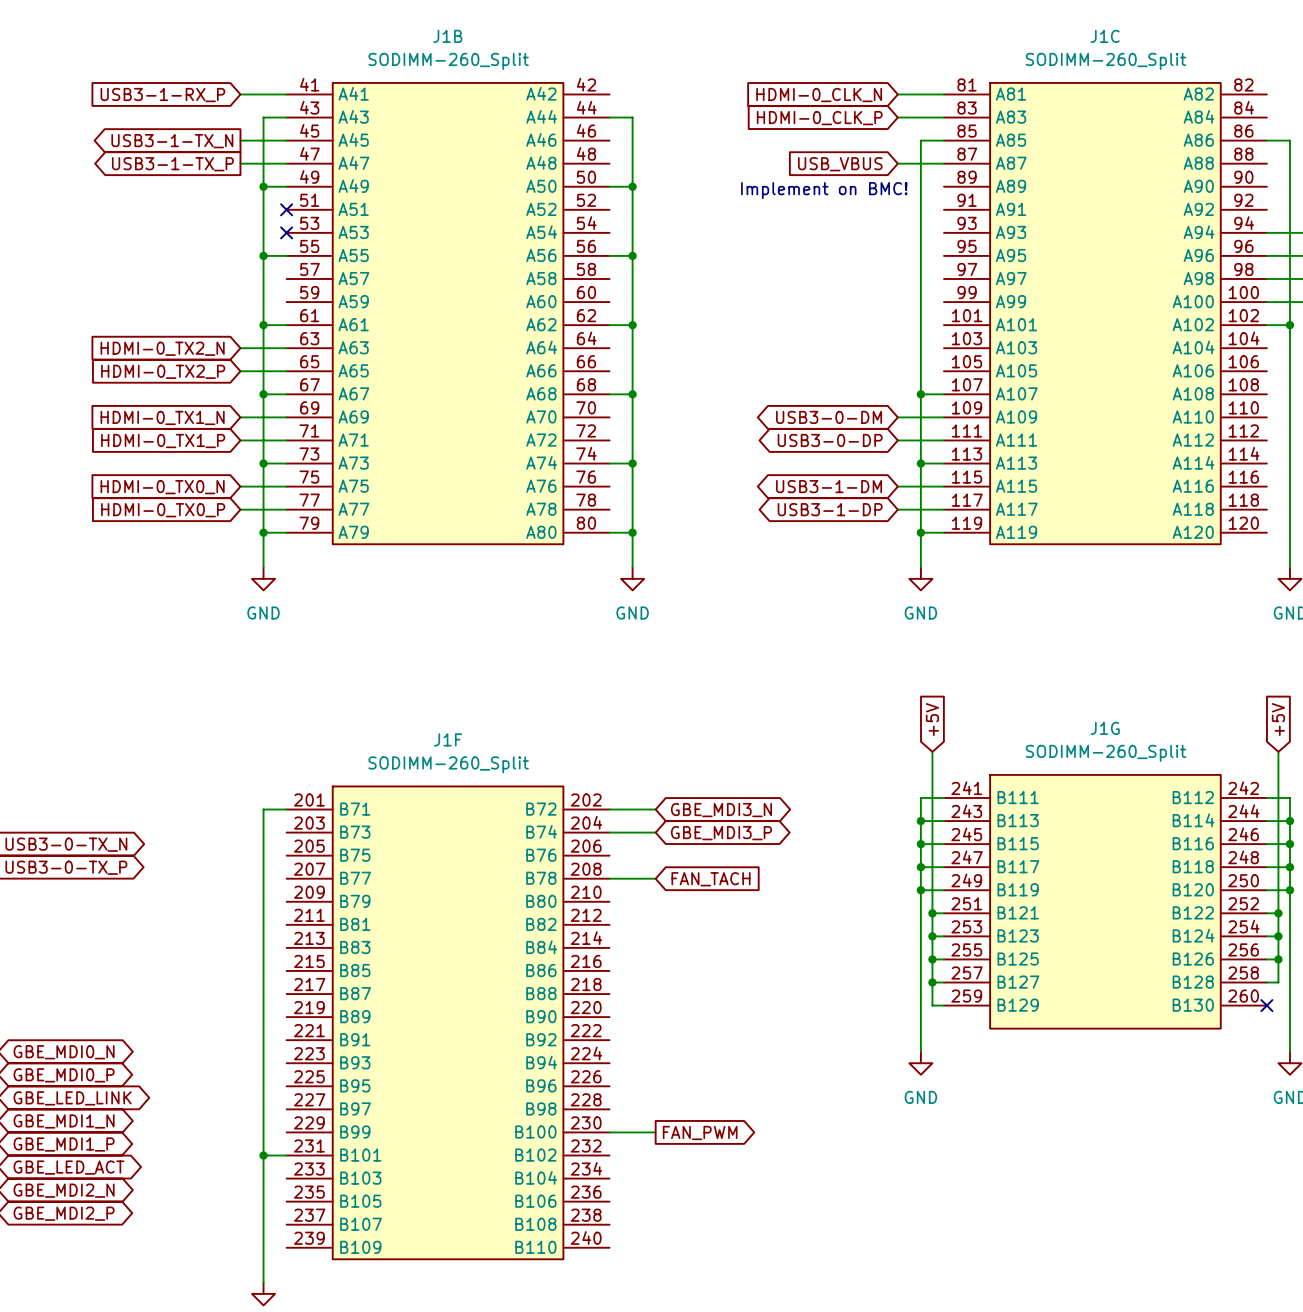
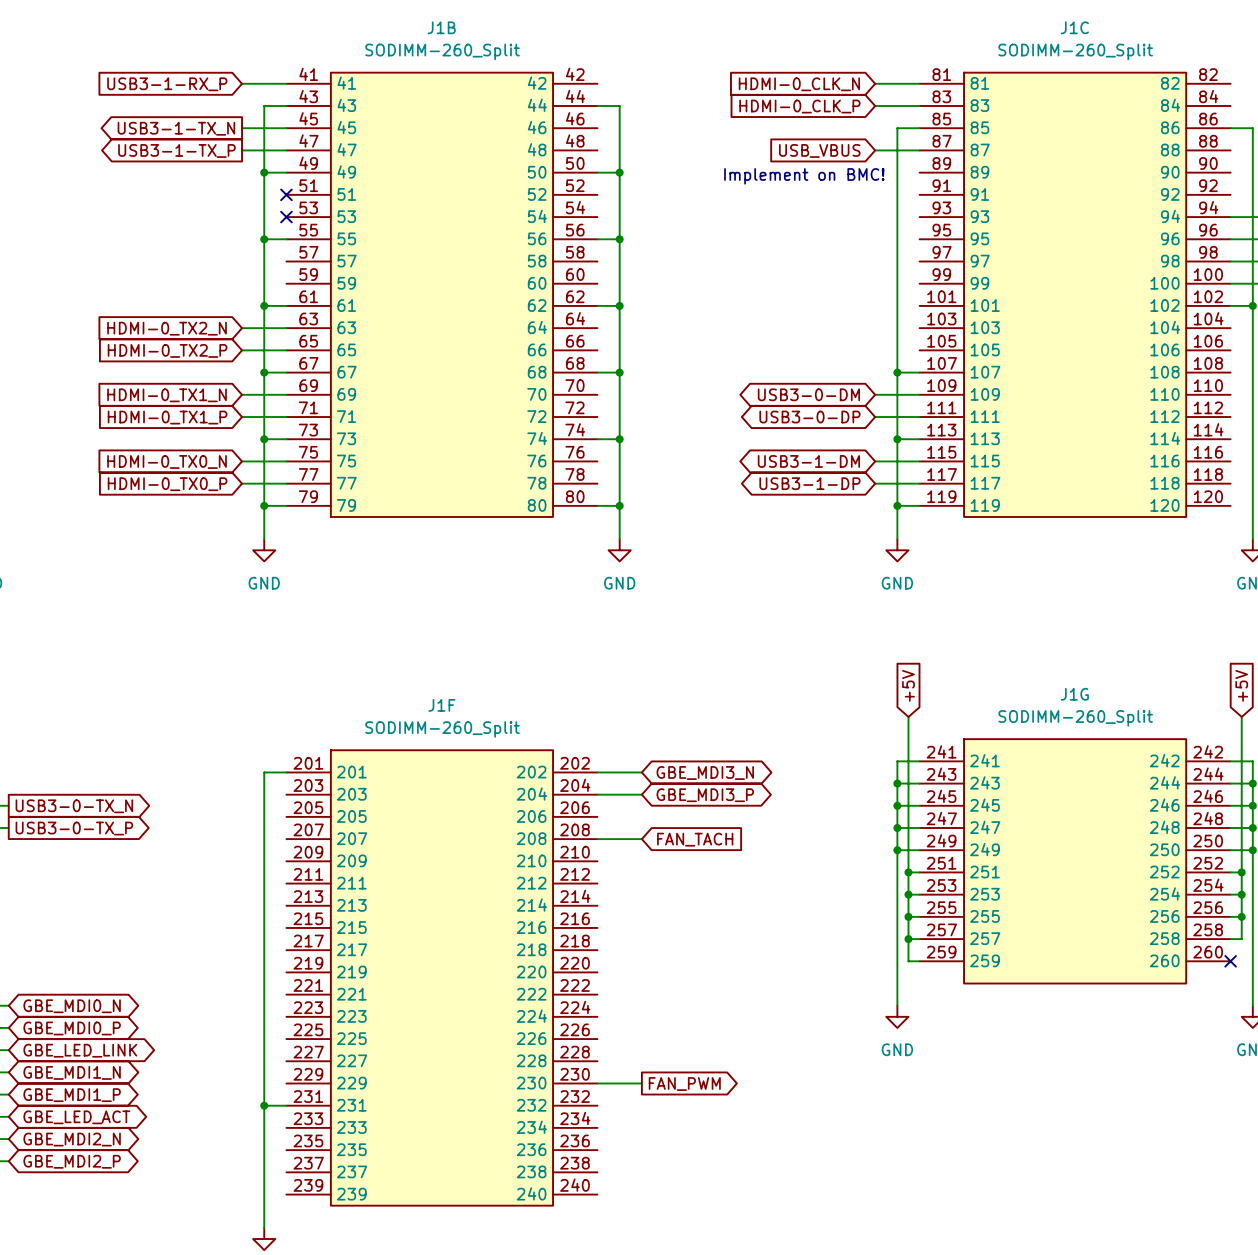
J1B symbol: [286, 82, 610, 545] -> [286, 72, 598, 517]
J1C symbol: [943, 82, 1267, 545] -> [919, 72, 1231, 517]
J1G symbol: [943, 774, 1267, 1029] -> [919, 739, 1231, 984]
J1F symbol: [286, 786, 610, 1260] -> [286, 750, 598, 1206]

